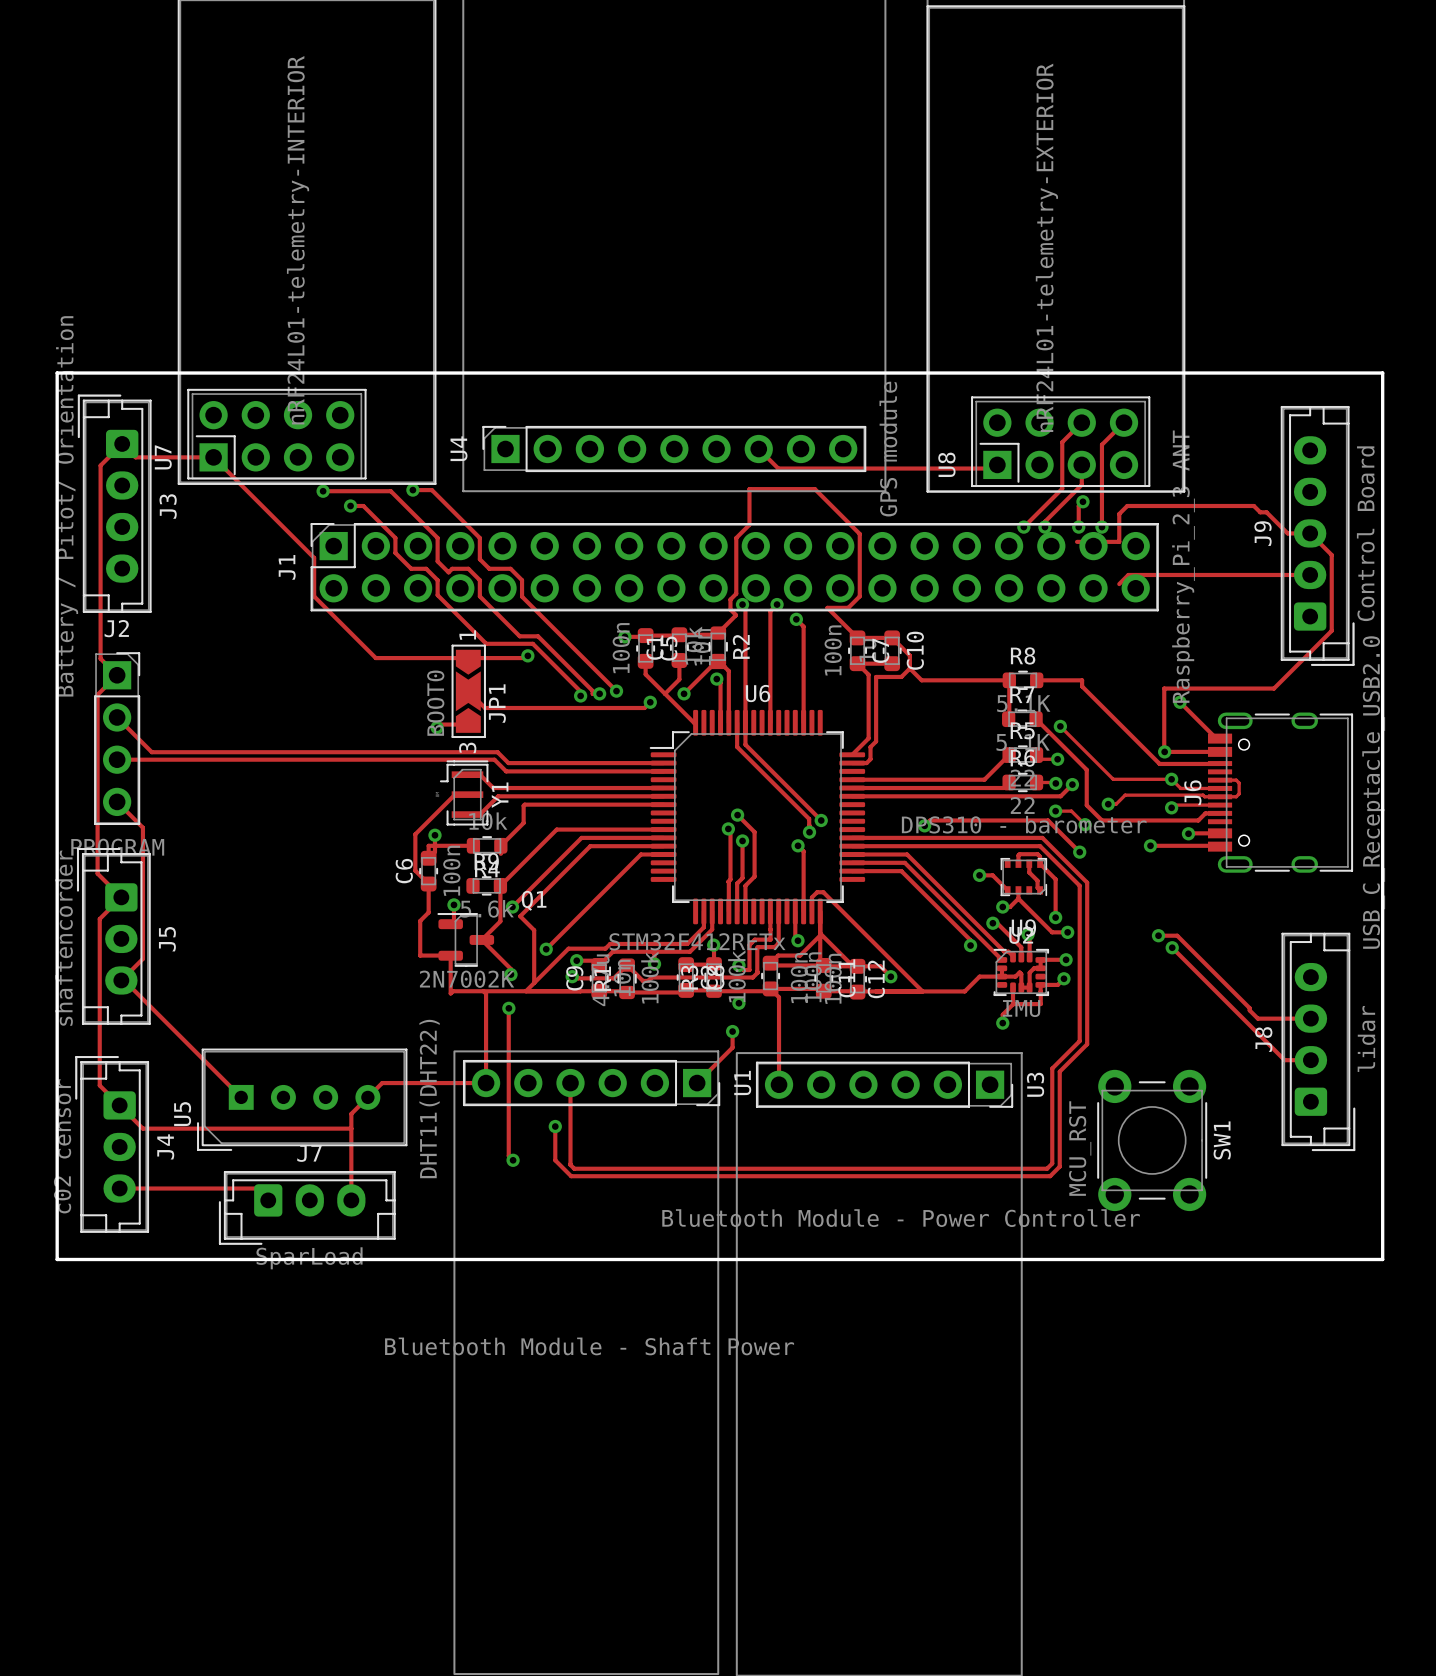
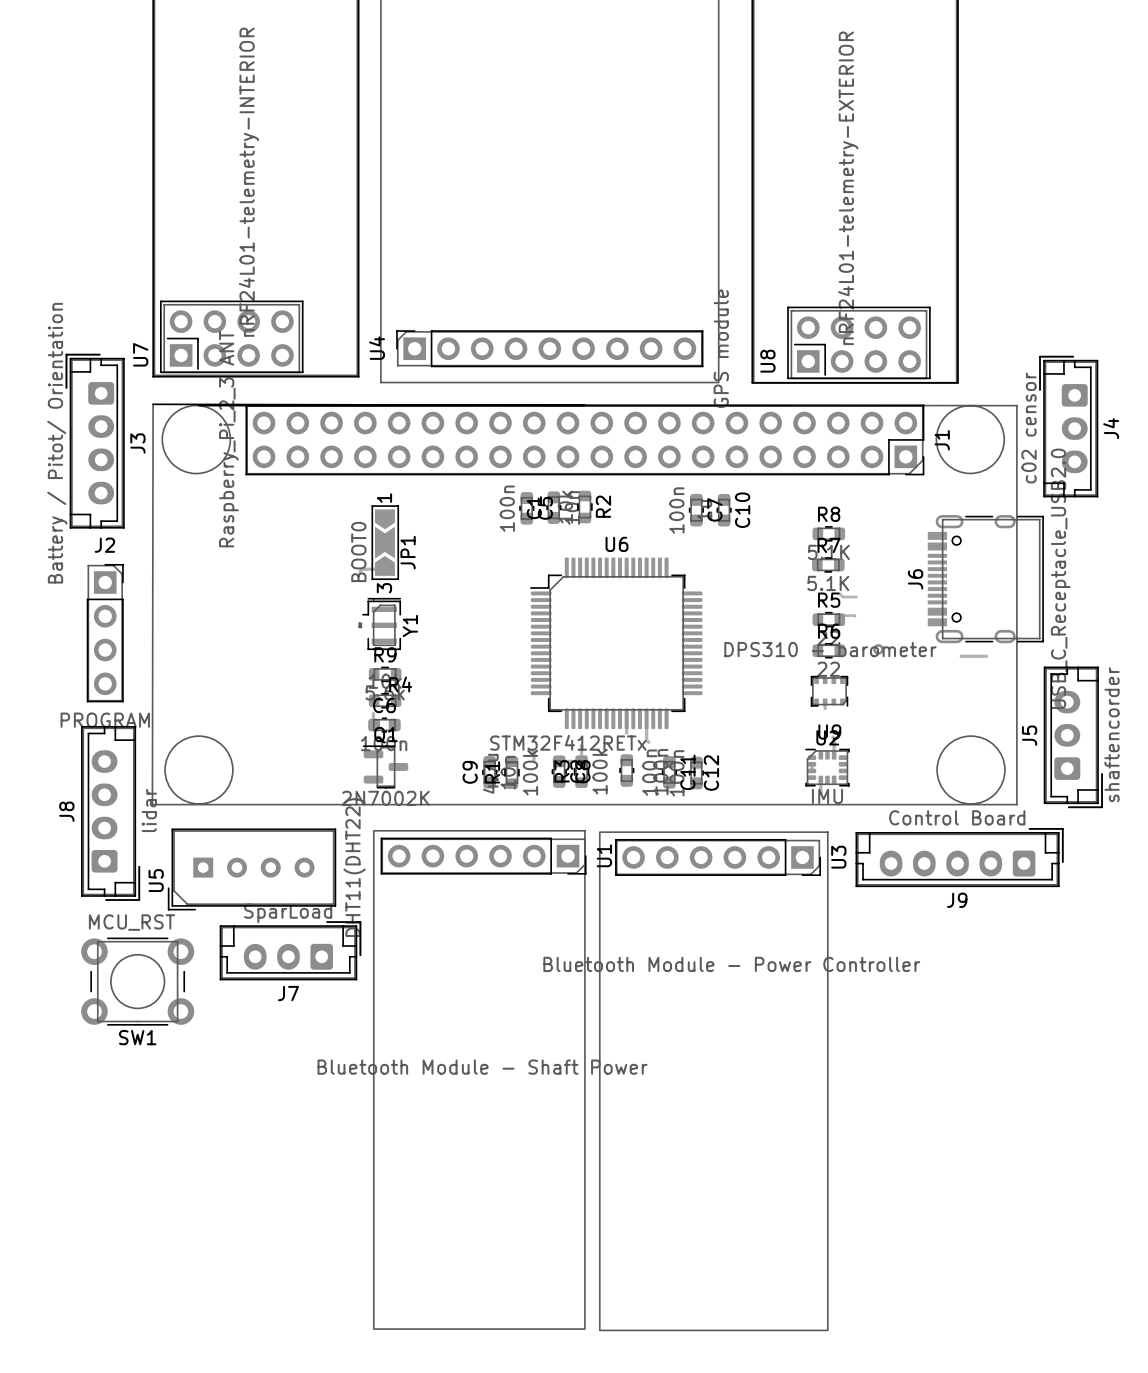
board edge: (57, 373) (1382, 373) (1382, 1259) (57, 1259) (57, 373) -> none
track: (1081, 422) (1062, 442) (1062, 488) (1023, 527) -> none
track: (1124, 422) (1101, 444) (1101, 527) -> none
track: (758, 449) (778, 468) (993, 468) (997, 464) -> none
track: (1081, 464) (1081, 484) (1044, 521) (1044, 527) -> none
track: (412, 490) (431, 490) (479, 538) (479, 559) (489, 568) (510, 568) (522, 580) (522, 596) (616, 691) -> none
via: (412, 490) -> none
track: (323, 491) (390, 491) (437, 538) (437, 561) (448, 572) (452, 568) (468, 568) (479, 580) (479, 596) (519, 636) (538, 636) (592, 690) (592, 693) (599, 693) -> none
via: (323, 491) -> none
track: (1082, 501) (1078, 505) (1078, 527) -> none
via: (1082, 501) -> none
J3 position: (114, 503) -> (95, 441)
track: (350, 505) (363, 505) (395, 538) (395, 552) (411, 568) (426, 568) (437, 580) (437, 595) (486, 643) (532, 643) (580, 691) (580, 695) -> none
via: (350, 505) -> none
J1 footprint: [310, 522, 1159, 612] -> [151, 403, 1018, 806]
via: (1023, 527) -> none
via: (1044, 527) -> none
via: (1078, 527) -> none
via: (1101, 527) -> none
J9 rotation: 0° (1317, 535) -> 90° counterclockwise (959, 857)
J9 position: (1317, 535) -> (959, 857)
track: (1077, 541) (1119, 541) (1119, 514) (1127, 505) (1253, 505) (1260, 512) (1266, 512) (1287, 533) (1310, 533) (1331, 555) (1331, 630) (1274, 688) (1164, 688) (1164, 751) (1220, 751) -> none
J1 value position: Raspberry_Pi_2_3 ANT (1183, 566) -> Raspberry_Pi_2_3 ANT (228, 439)
J1 name position: J1 (287, 567) -> J1 (942, 440)
track: (1310, 574) (1128, 574) (1119, 584) -> none
track: (742, 604) (745, 607) (745, 744) (821, 820) -> none
via: (742, 604) -> none
track: (777, 604) (770, 611) (770, 722) -> none
via: (777, 604) -> none
track: (796, 619) (803, 626) (803, 722) -> none
via: (796, 619) -> none
track: (624, 636) (716, 634) (735, 615) (730, 609) (730, 599) (736, 593) (736, 538) (749, 524) (749, 489) (814, 489) (859, 533) (859, 596) (848, 607) (827, 607) (857, 637) (892, 637) (909, 655) (909, 668) -> none
via: (624, 636) -> none
track: (527, 655) (525, 658) (375, 658) (314, 596) (314, 557) (213, 457) (135, 457) (122, 443) (100, 465) (100, 658) (117, 675) (97, 694) (97, 873) (121, 897) (99, 918) (99, 1085) (142, 1128) (351, 1128) -> none
via: (527, 655) -> none
track: (679, 660) (679, 679) (665, 693) -> none
track: (718, 660) (728, 671) (728, 722) -> none
track: (645, 661) (645, 674) (695, 722) -> none
track: (892, 663) (857, 663) (868, 674) (868, 738) (852, 754) -> none
track: (724, 667) (710, 667) (684, 693) -> none
track: (909, 668) (901, 676) (876, 676) (876, 741) (870, 747) (870, 759) (866, 763) (852, 763) -> none
track: (909, 668) (921, 680) (1009, 680) (1008, 719) -> none
track: (716, 679) (720, 682) (720, 722) -> none
via: (716, 679) -> none
track: (1036, 680) (1082, 680) (1082, 686) (1159, 763) (1220, 763) -> none
track: (468, 691) (485, 708) (644, 708) (650, 702) -> none
via: (616, 691) -> none
via: (599, 693) -> none
via: (684, 693) -> none
via: (580, 695) -> none
via: (650, 702) -> none
track: (1180, 702) (1216, 738) (1220, 738) -> none
via: (1180, 702) -> none
track: (117, 717) (151, 752) (497, 752) (508, 763) (663, 763) -> none
track: (1036, 719) (1086, 769) (1086, 805) (1101, 820) (1198, 820) (1205, 813) (1220, 813) -> none
track: (737, 722) (737, 746) (809, 819) (809, 832) -> none
track: (1060, 726) (1113, 779) (1171, 779) (1180, 788) (1220, 788) -> none
via: (1060, 726) -> none
via: (437, 727) -> none
J2 position: (117, 738) -> (105, 633)
via: (1164, 751) -> none
track: (1009, 755) (984, 779) (852, 779) -> none
R5 position: (1022, 755) -> (828, 619)
track: (117, 759) (494, 759) (506, 771) (663, 771) -> none
via: (1057, 759) -> none
track: (467, 774) (479, 774) (493, 788) (663, 788) -> none
via: (1171, 779) -> none
track: (1220, 780) (1236, 780) (1239, 783) (1239, 793) (1236, 796) (1125, 795) (1116, 804) (1108, 804) -> none
track: (1009, 782) (1003, 788) (852, 788) -> none
R6 position: (1022, 782) -> (828, 650)
via: (1055, 783) -> none
track: (1072, 784) (1060, 796) (852, 796) -> none
via: (1072, 784) -> none
J6 position: (1280, 792) -> (985, 579)
track: (467, 794) (455, 794) (415, 834) (415, 870) (428, 884) (428, 912) (420, 920) (420, 955) (450, 955) -> none
track: (663, 796) (498, 796) (479, 814) (467, 814) -> none
track: (117, 801) (142, 827) (142, 958) (121, 980) (124, 980) (241, 1097) -> none
track: (663, 804) (524, 804) (523, 823) (500, 845) -> none
via: (1108, 804) -> none
track: (1220, 805) (1174, 805) (1171, 807) -> none
via: (1171, 807) -> none
track: (1055, 811) (1071, 811) (1085, 824) -> none
via: (1055, 811) -> none
track: (737, 815) (754, 832) (754, 876) (745, 885) (745, 911) -> none
via: (737, 815) -> none
via: (821, 820) -> none
track: (924, 825) (930, 820) (1048, 820) (1079, 852) -> none
via: (924, 825) -> none
track: (728, 828) (730, 831) (728, 911) -> none
via: (728, 828) -> none
track: (663, 829) (556, 829) (500, 885) (500, 921) (481, 939) (510, 969) (510, 974) -> none
via: (809, 832) -> none
via: (1188, 833) -> none
track: (434, 835) (434, 851) (428, 858) (428, 845) (473, 845) -> none
via: (434, 835) -> none
track: (663, 837) (581, 837) (512, 907) -> none
track: (852, 837) (1042, 837) (1087, 882) (1087, 1044) (1059, 1071) (1059, 1166) (1050, 1176) (571, 1176) (555, 1160) (555, 1126) -> none
track: (742, 840) (742, 878) (737, 883) (737, 911) -> none
via: (742, 840) -> none
R4 position: (487, 845) -> (385, 700)
track: (798, 845) (803, 851) (803, 911) -> none
via: (798, 845) -> none
track: (1150, 845) (1220, 846) -> none
via: (1150, 845) -> none
track: (663, 846) (590, 846) (520, 916) (534, 930) (534, 983) -> none
track: (852, 846) (1040, 846) (1079, 885) (1079, 1041) (1052, 1068) (1052, 1163) (1047, 1168) (574, 1168) (570, 1164) (570, 1083) -> none
via: (1079, 852) -> none
track: (501, 853) (500, 853) -> none
track: (663, 854) (640, 854) (546, 949) -> none
track: (852, 854) (907, 854) (1004, 951) (1008, 951) (1013, 957) -> none
track: (852, 862) (904, 862) (1002, 959) -> none
track: (1018, 863) (1019, 854) (1037, 854) (1040, 856) (1040, 863) (1055, 879) (1055, 917) -> none
track: (1029, 863) (1029, 872) (1037, 880) (1037, 887) (1040, 890) -> none
C6 rotation: 0° (428, 871) -> 90° clockwise (384, 725)
C6 position: (428, 871) -> (384, 725)
track: (852, 871) (901, 871) (970, 940) (970, 945) -> none
track: (979, 875) (992, 875) (1007, 890) -> none
via: (979, 875) -> none
R9 position: (486, 885) -> (385, 674)
Q1 name position: Q1 (534, 900) -> Q1 (385, 735)
via: (453, 904) -> none
via: (512, 907) -> none
track: (1002, 907) (1010, 907) (1018, 898) (1052, 932) (1067, 932) -> none
via: (1002, 907) -> none
track: (703, 911) (703, 927) (687, 943) (610, 943) (605, 948) (568, 948) (525, 991) -> none
track: (712, 911) (712, 929) (690, 951) (612, 951) (599, 965) (594, 960) (576, 960) -> none
track: (778, 911) (778, 943) (774, 947) (757, 947) (757, 972) (752, 977) (651, 977) (648, 980) (642, 980) (627, 965) (613, 978) (572, 976) -> none
track: (811, 911) (811, 897) (817, 892) (823, 892) (922, 991) -> none
track: (820, 911) (820, 961) (824, 966) (880, 966) (890, 976) -> none
via: (1055, 917) -> none
track: (992, 923) (997, 923) (1021, 947) (1021, 957) -> none
via: (992, 923) -> none
track: (770, 929) (770, 939) (754, 939) (749, 944) (749, 970) (743, 970) (738, 965) -> none
via: (1067, 932) -> none
track: (820, 933) (853, 966) -> none
via: (1028, 934) -> none
track: (820, 935) (800, 955) (778, 955) (770, 963) (772, 965) (823, 965) -> none
track: (1158, 935) (1177, 935) (1257, 1018) (1310, 1018) -> none
via: (1158, 935) -> none
J5 rotation: 0° (113, 936) -> 180° (1073, 737)
J5 position: (113, 936) -> (1073, 737)
Q1 position: (465, 939) -> (385, 766)
via: (797, 940) -> none
via: (713, 945) -> none
via: (970, 945) -> none
track: (1172, 947) (1284, 1060) (1310, 1060) -> none
via: (1172, 947) -> none
via: (546, 949) -> none
track: (450, 955) (450, 993) (452, 991) (684, 992) (686, 990) (768, 991) (770, 988) -> none
track: (1040, 959) (1066, 959) -> none
track: (1040, 959) (1040, 968) (1034, 968) (1029, 972) (1029, 987) (1021, 987) (1019, 972) (1015, 976) (979, 976) (964, 991) (857, 992) (823, 991) (821, 988) (770, 988) -> none
via: (1066, 959) -> none
via: (576, 960) -> none
via: (654, 964) -> none
via: (738, 965) -> none
via: (510, 974) -> none
via: (572, 976) -> none
via: (890, 976) -> none
track: (1063, 978) (1057, 984) (1040, 984) (1040, 991) -> none
via: (1063, 978) -> none
track: (770, 988) (779, 997) (779, 1084) -> none
track: (483, 991) (486, 993) (486, 1083) (382, 1083) (351, 1113) (351, 1200) -> none
track: (1040, 991) (1040, 1004) (1013, 1004) (1002, 1014) (1002, 1023) -> none
via: (738, 1003) -> none
track: (508, 1008) (508, 1155) (513, 1160) -> none
via: (508, 1008) -> none
via: (1002, 1023) -> none
track: (732, 1031) (732, 1047) (697, 1083) -> none
via: (732, 1031) -> none
J8 position: (1318, 1041) -> (110, 813)
via: (555, 1126) -> none
SW1 rotation: 0° (1152, 1140) -> 90° clockwise (137, 981)
SW1 position: (1152, 1140) -> (137, 981)
J4 position: (112, 1144) -> (1068, 426)
via: (513, 1160) -> none
track: (119, 1188) (256, 1188) (268, 1200) -> none
J7 rotation: 0° (307, 1207) -> 180° (290, 950)

